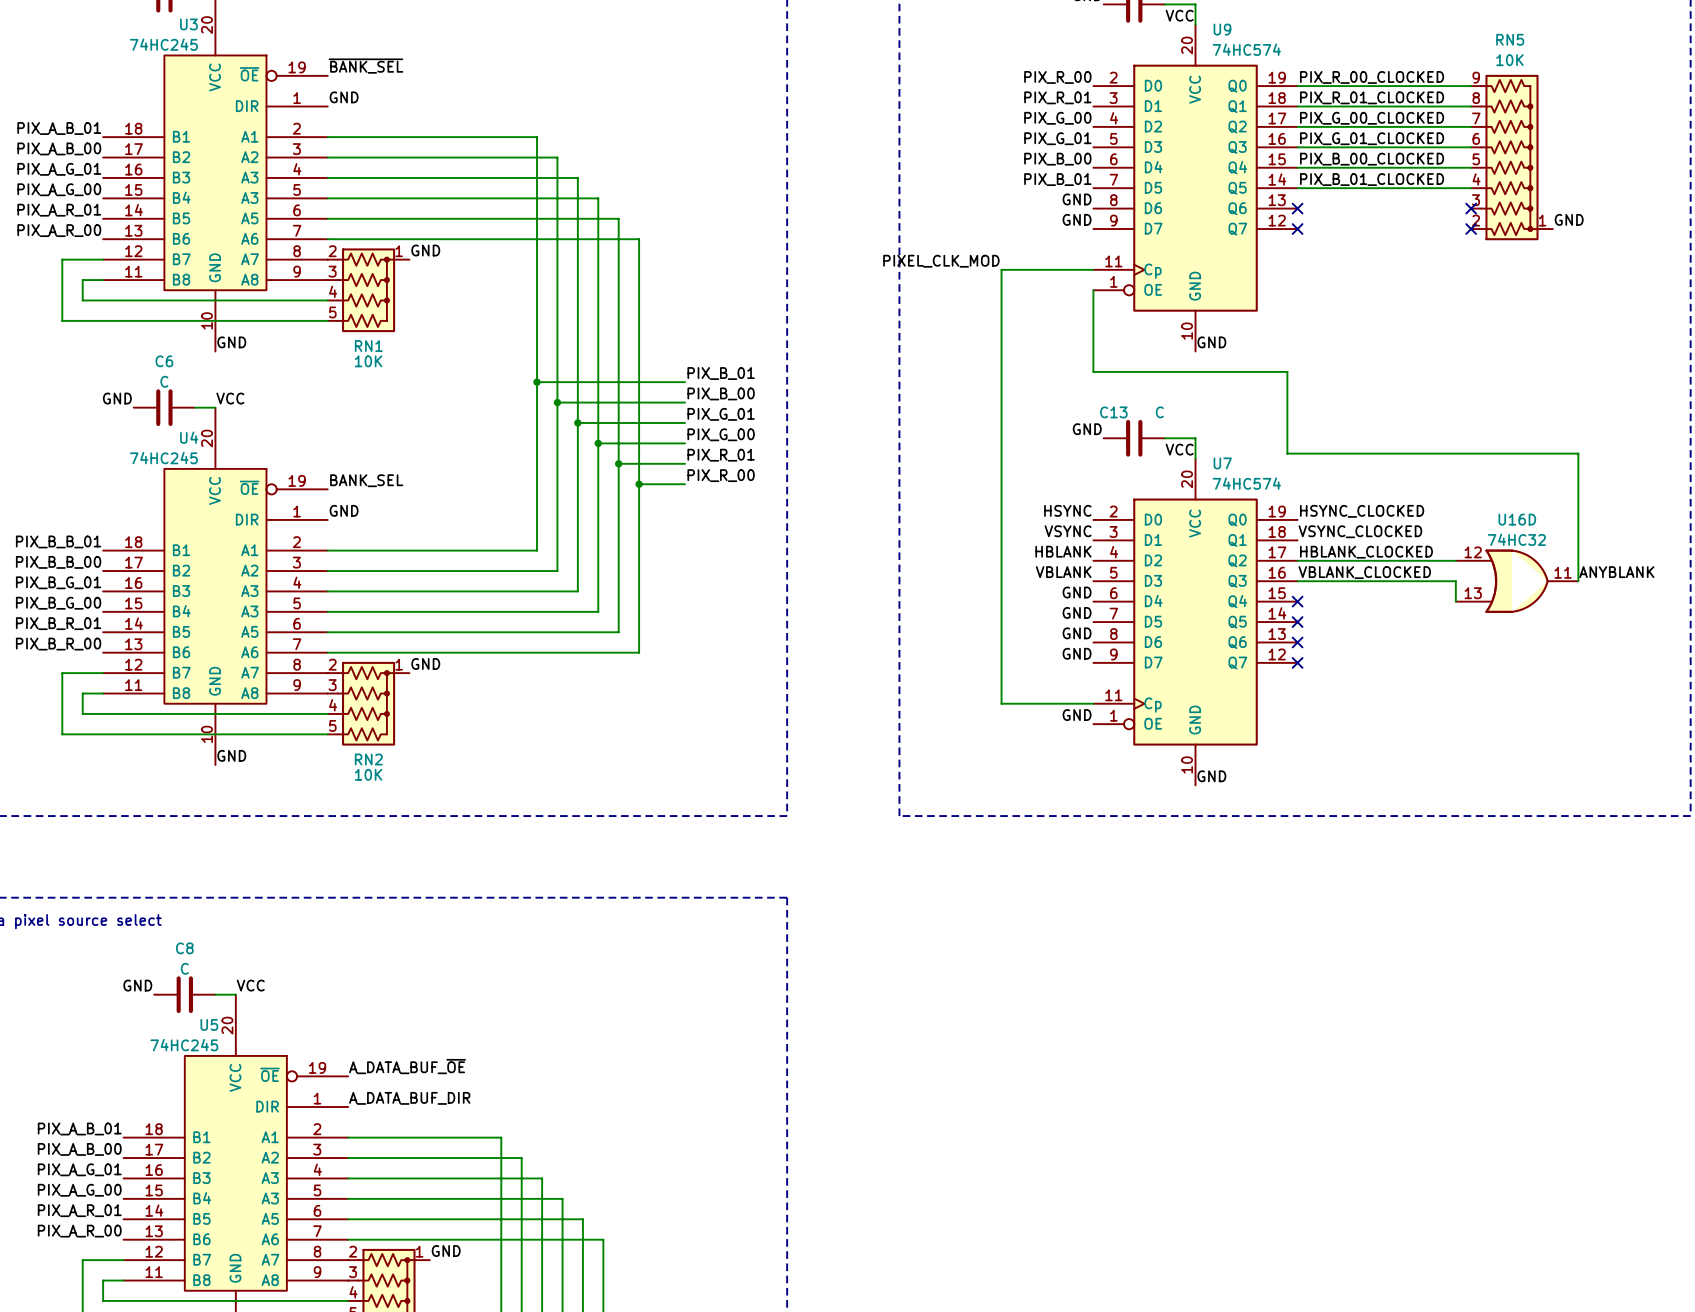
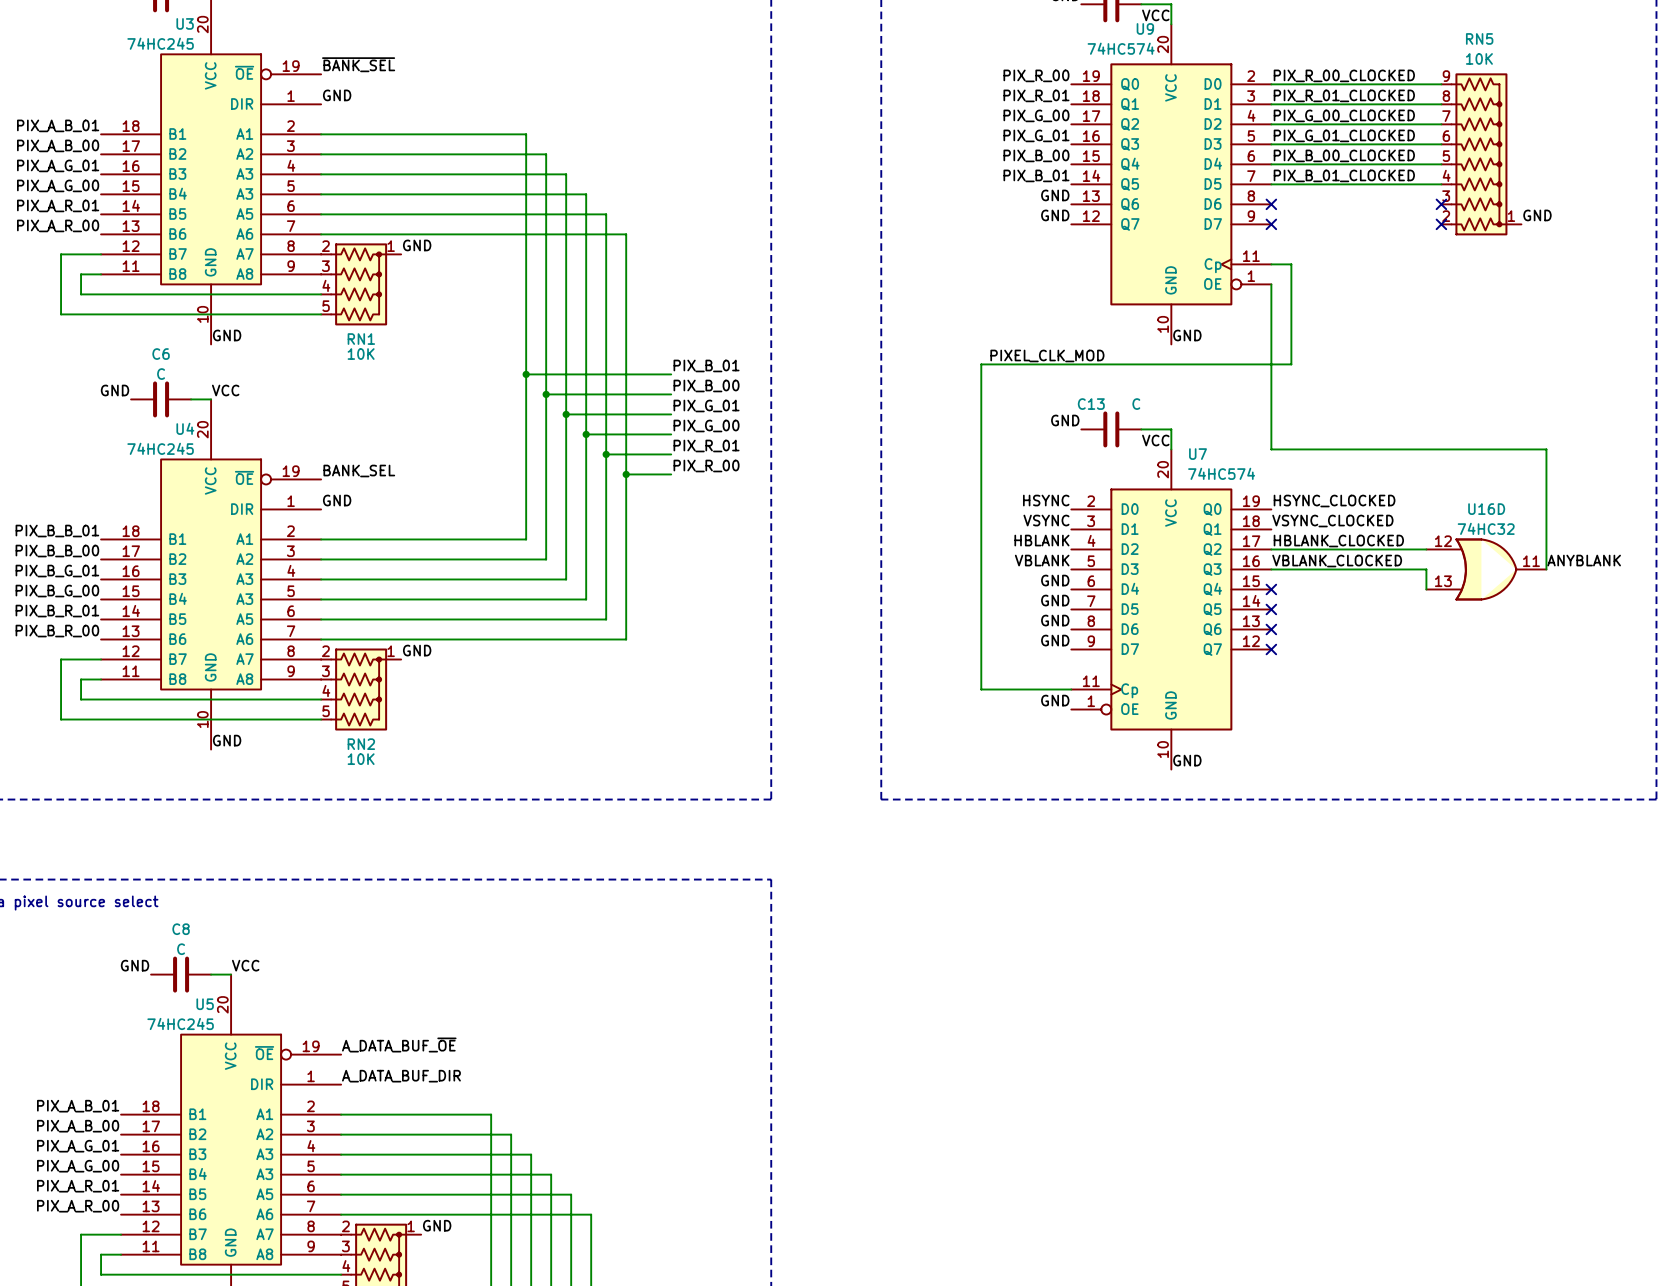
U9 flip: as is (1195, 188) -> left-right (1171, 184)
label position: PIXEL_CLK_MOD (941, 261) -> PIXEL_CLK_MOD (1047, 355)
wire: (1093, 269) (1001, 269) (1001, 371) -> (1071, 364) (981, 364)
wire: none -> (1271, 264) (1291, 264) (1291, 364) (1261, 364)
wire: (1093, 290) (1093, 371) -> none
wire: (1287, 371) (1287, 453) (1578, 453) (1578, 458) -> (1271, 284) (1271, 449) (1546, 449)

